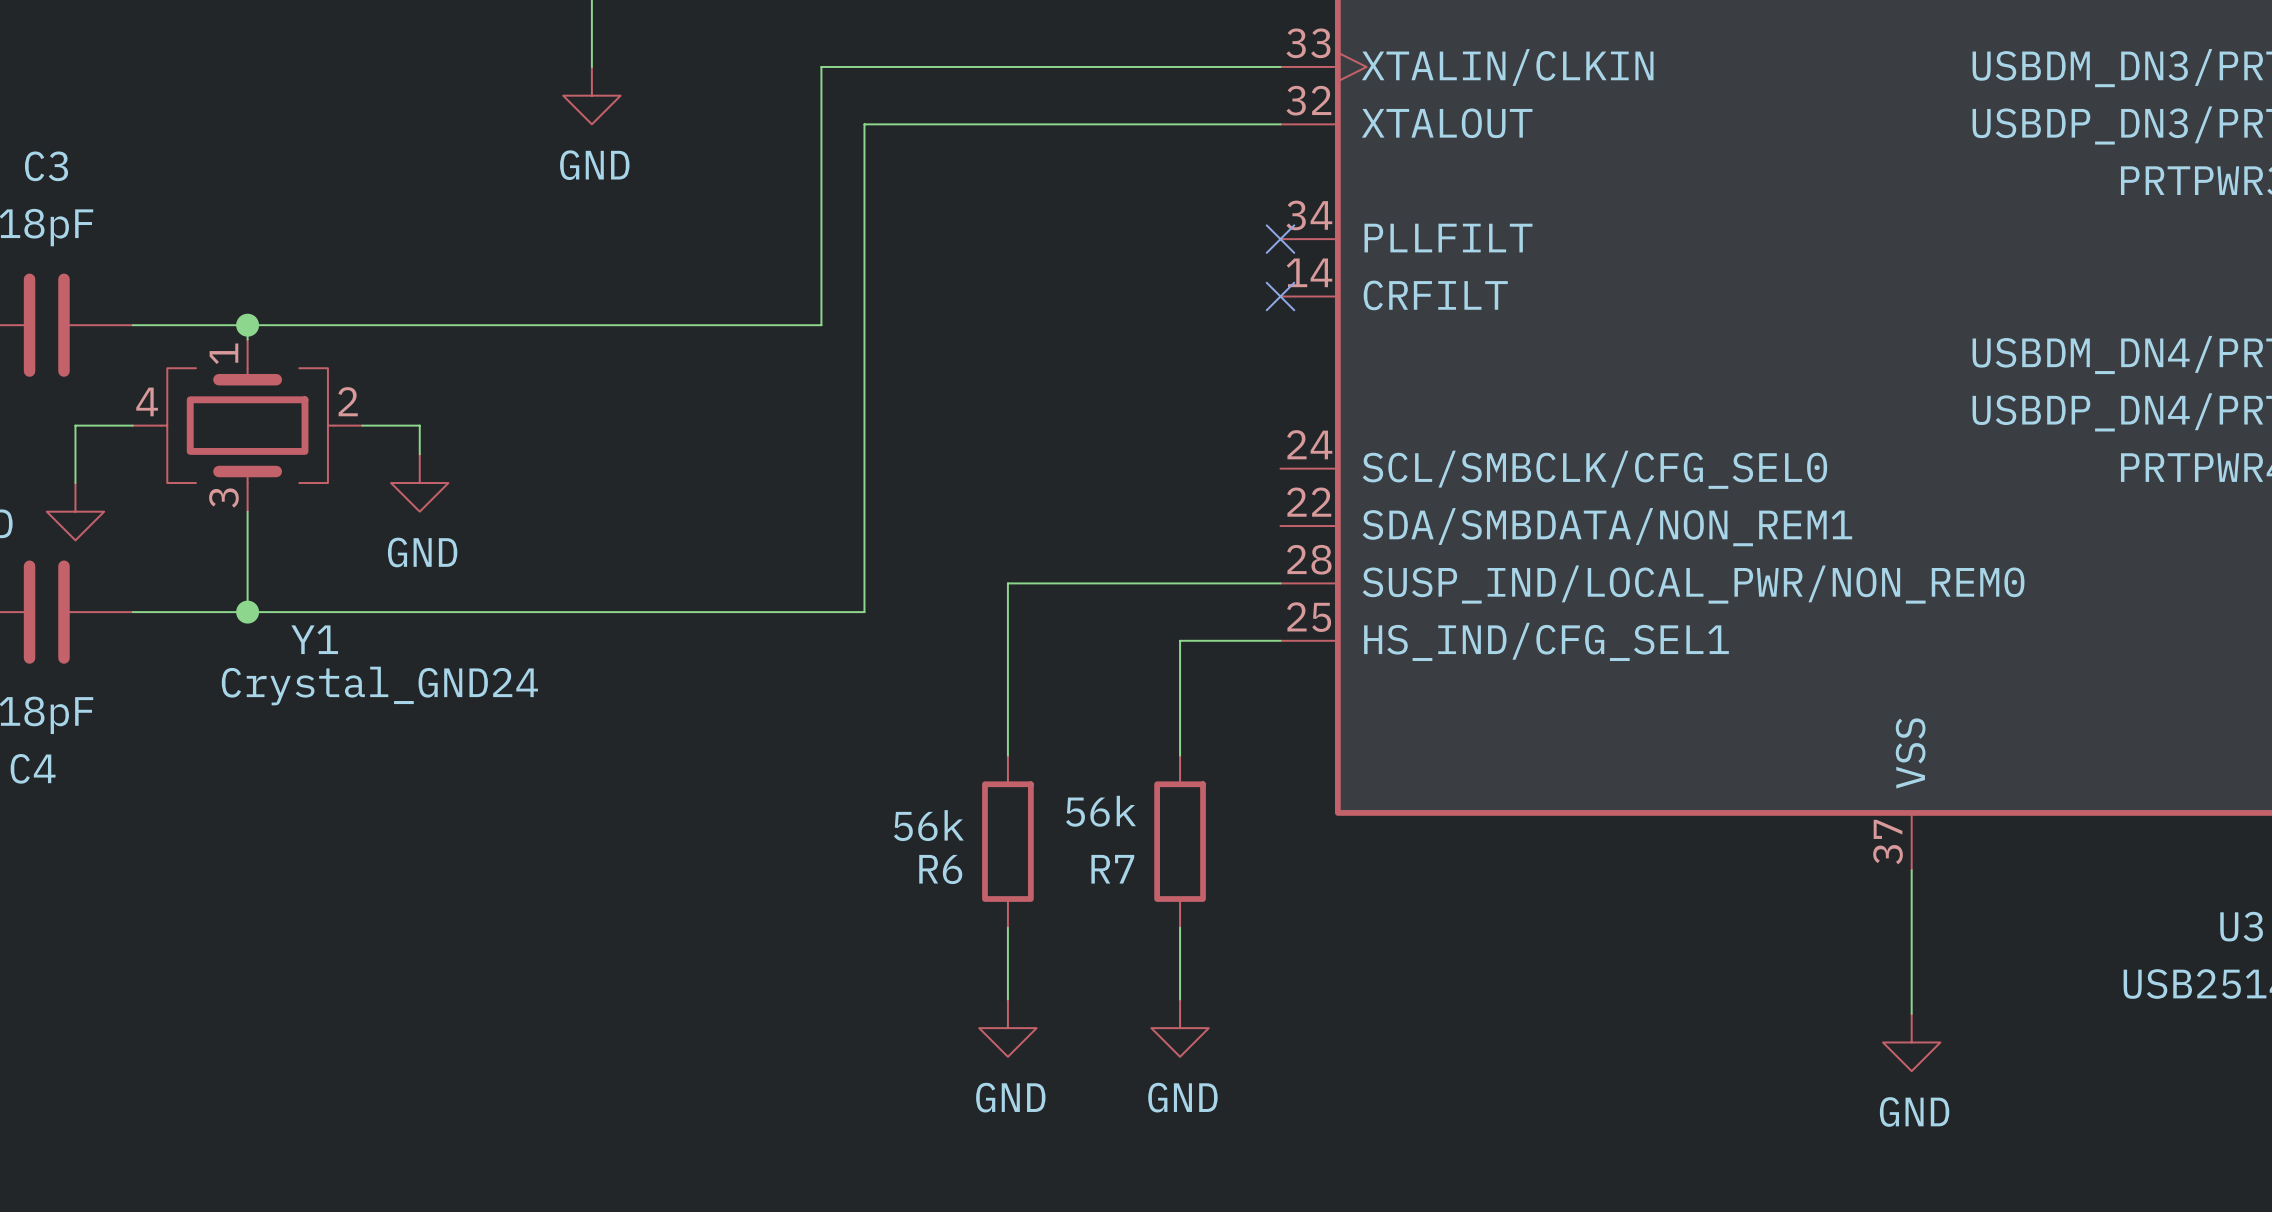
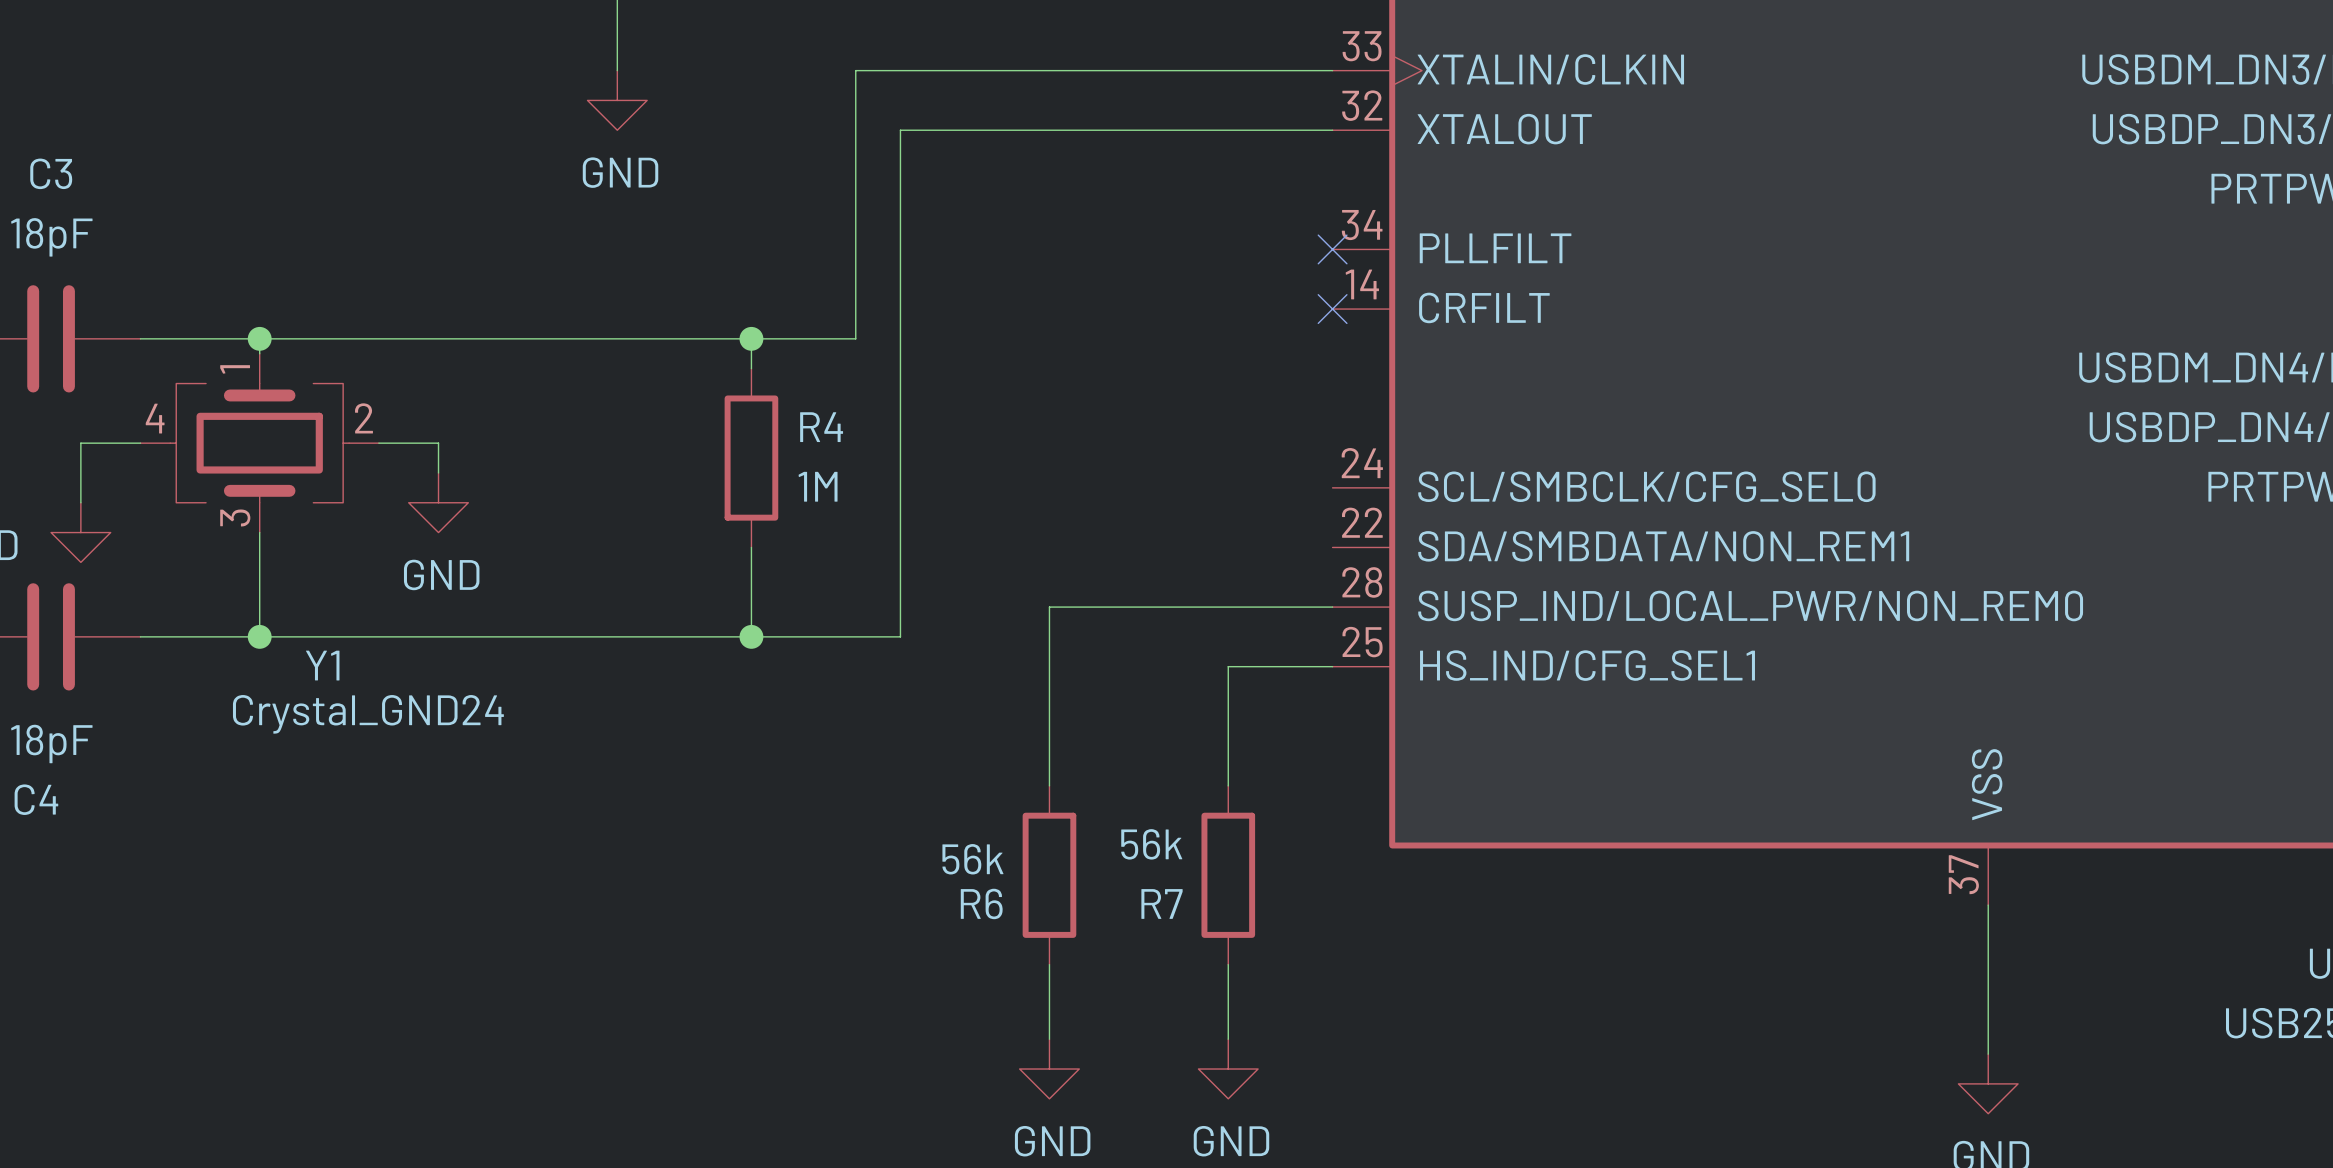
wire: none -> (751, 338) (751, 368)
junction: none -> (751, 338)
R4: none -> 1M (751, 458)
wire: none -> (751, 547) (751, 636)
junction: none -> (751, 636)

